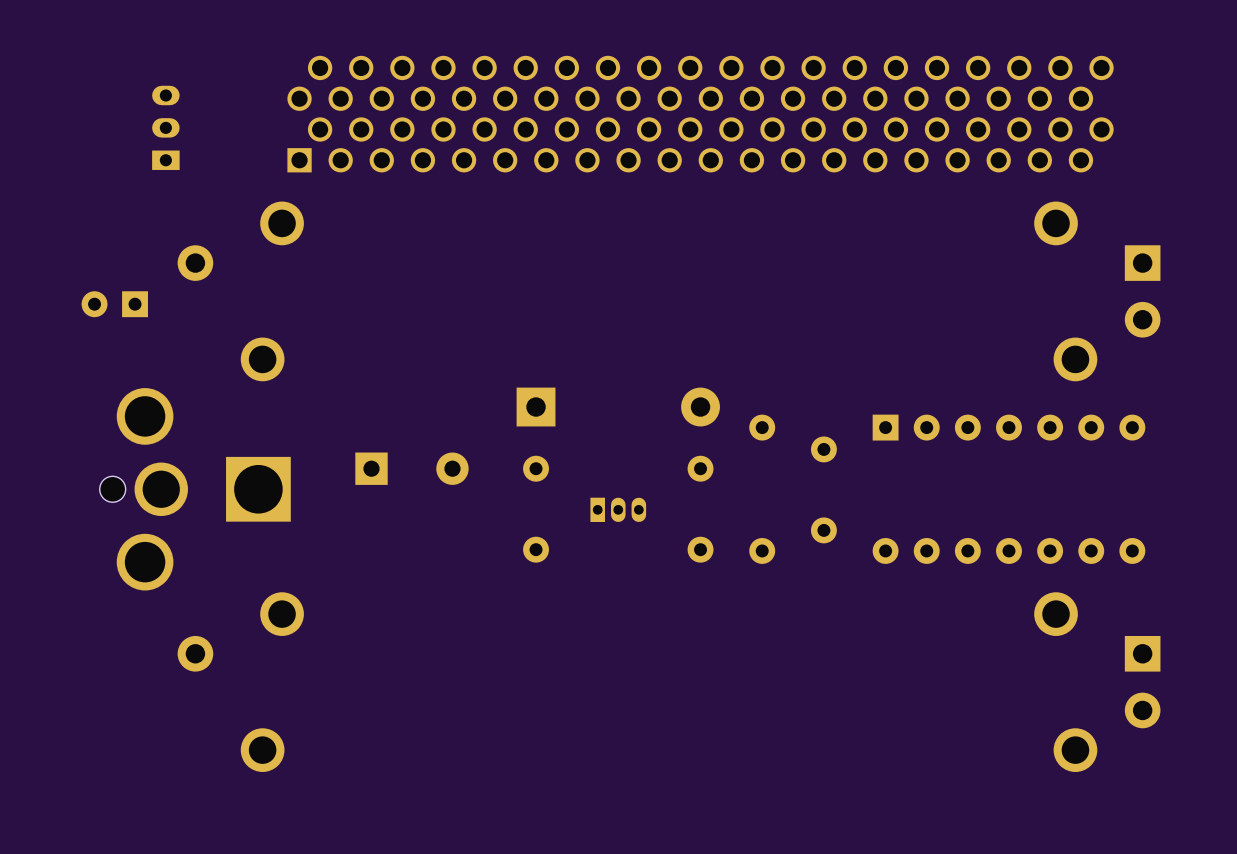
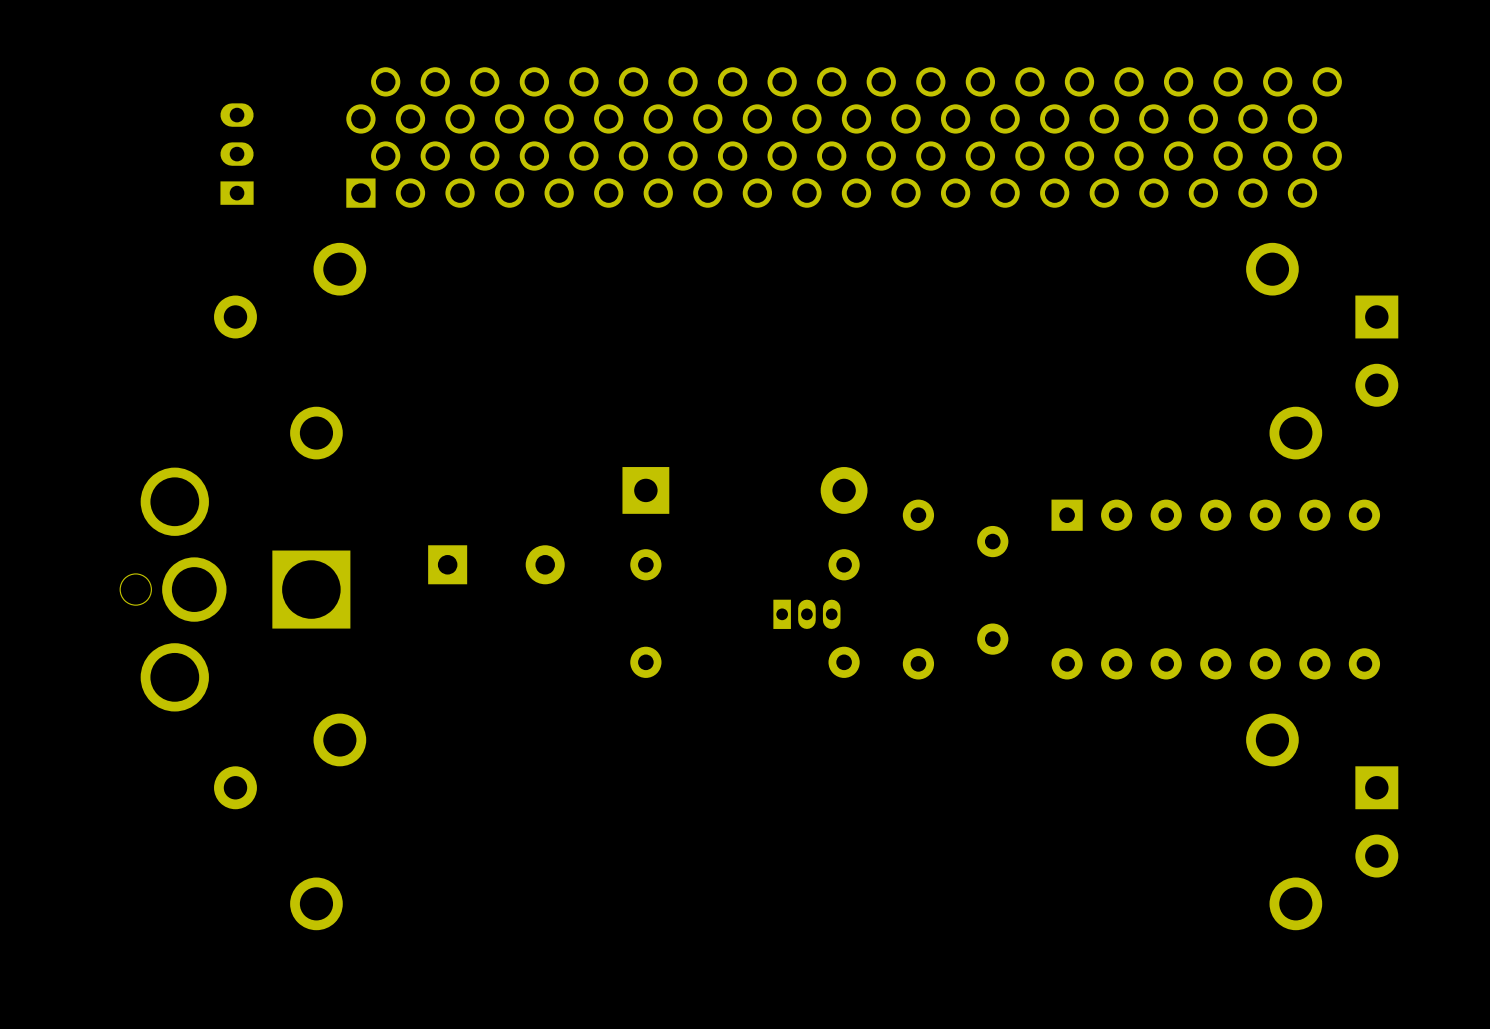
part position: (165, 127) -> (237, 154)
part: (114, 304) -> none
part position: (618, 509) -> (806, 614)

